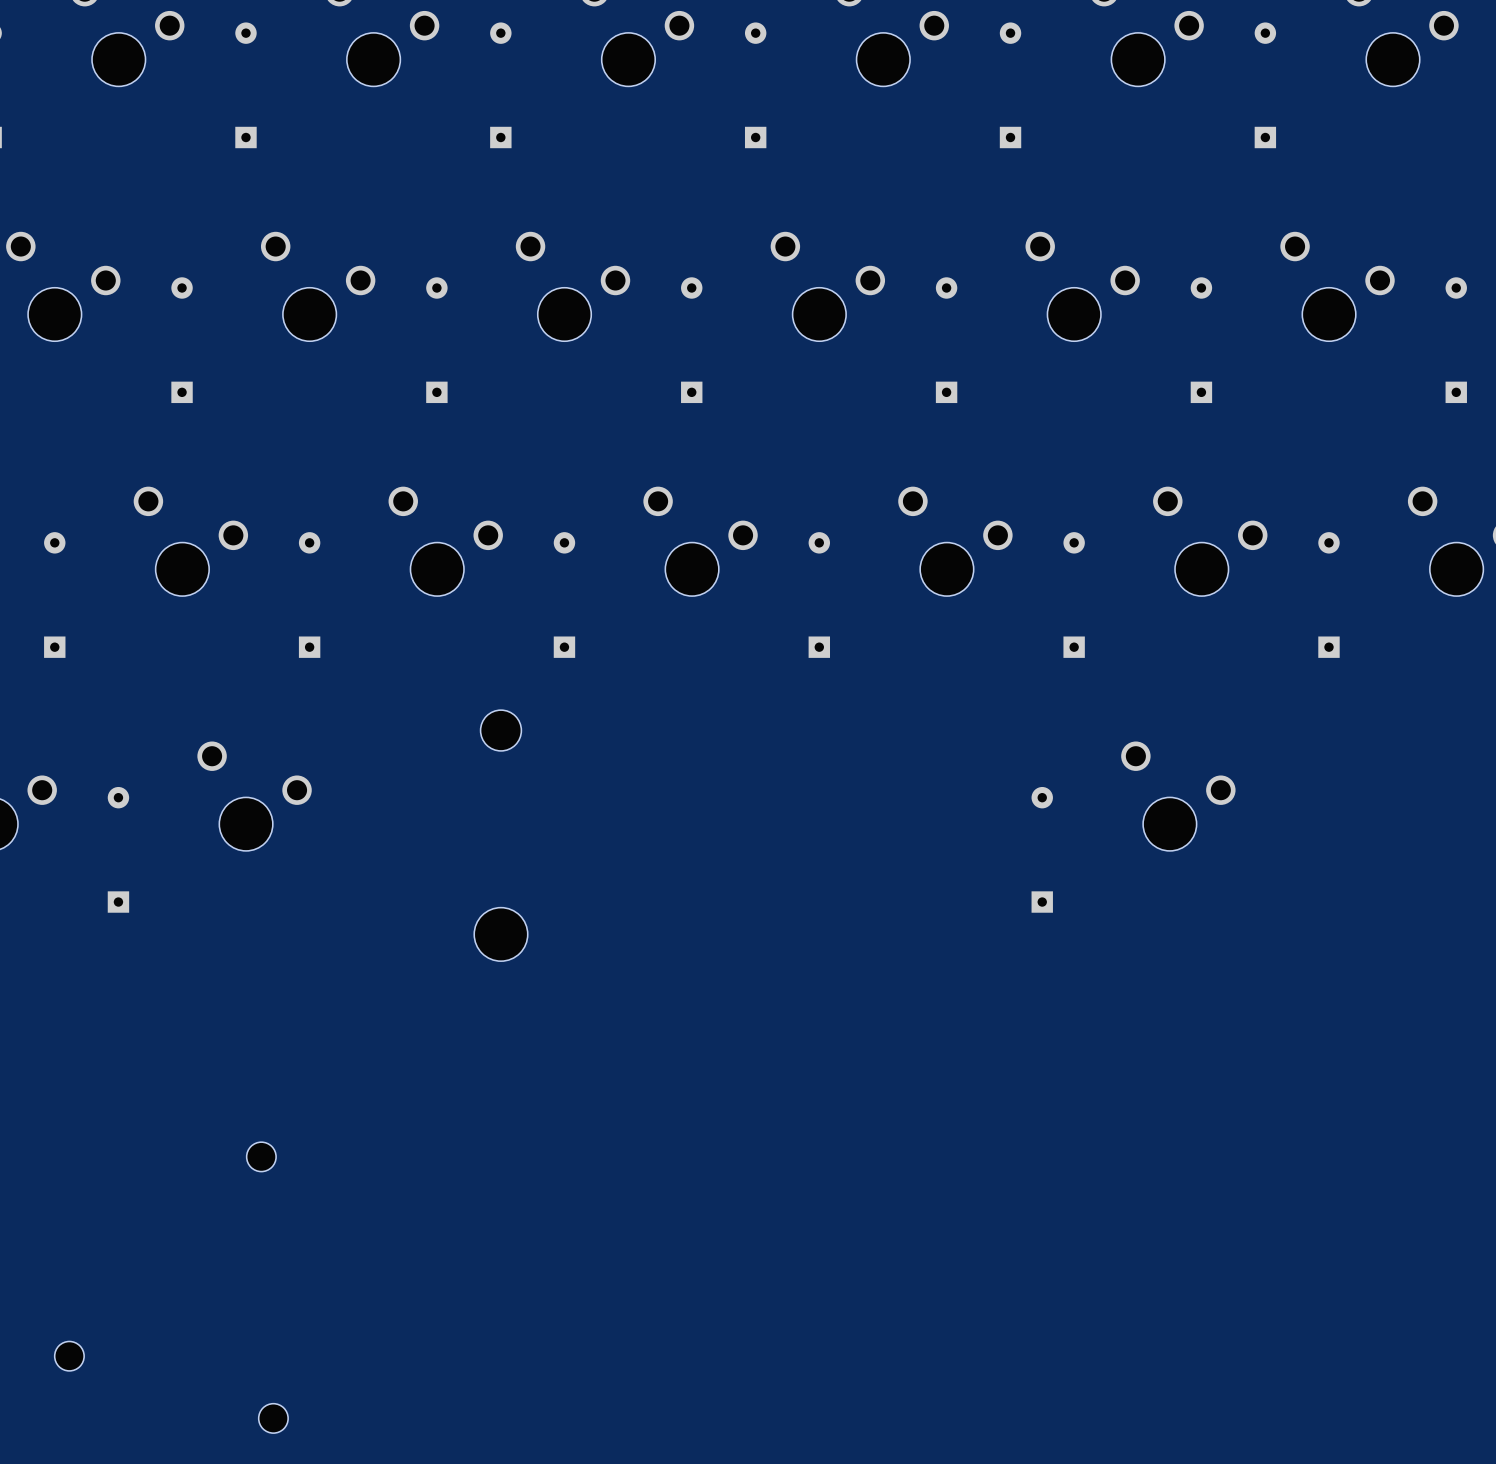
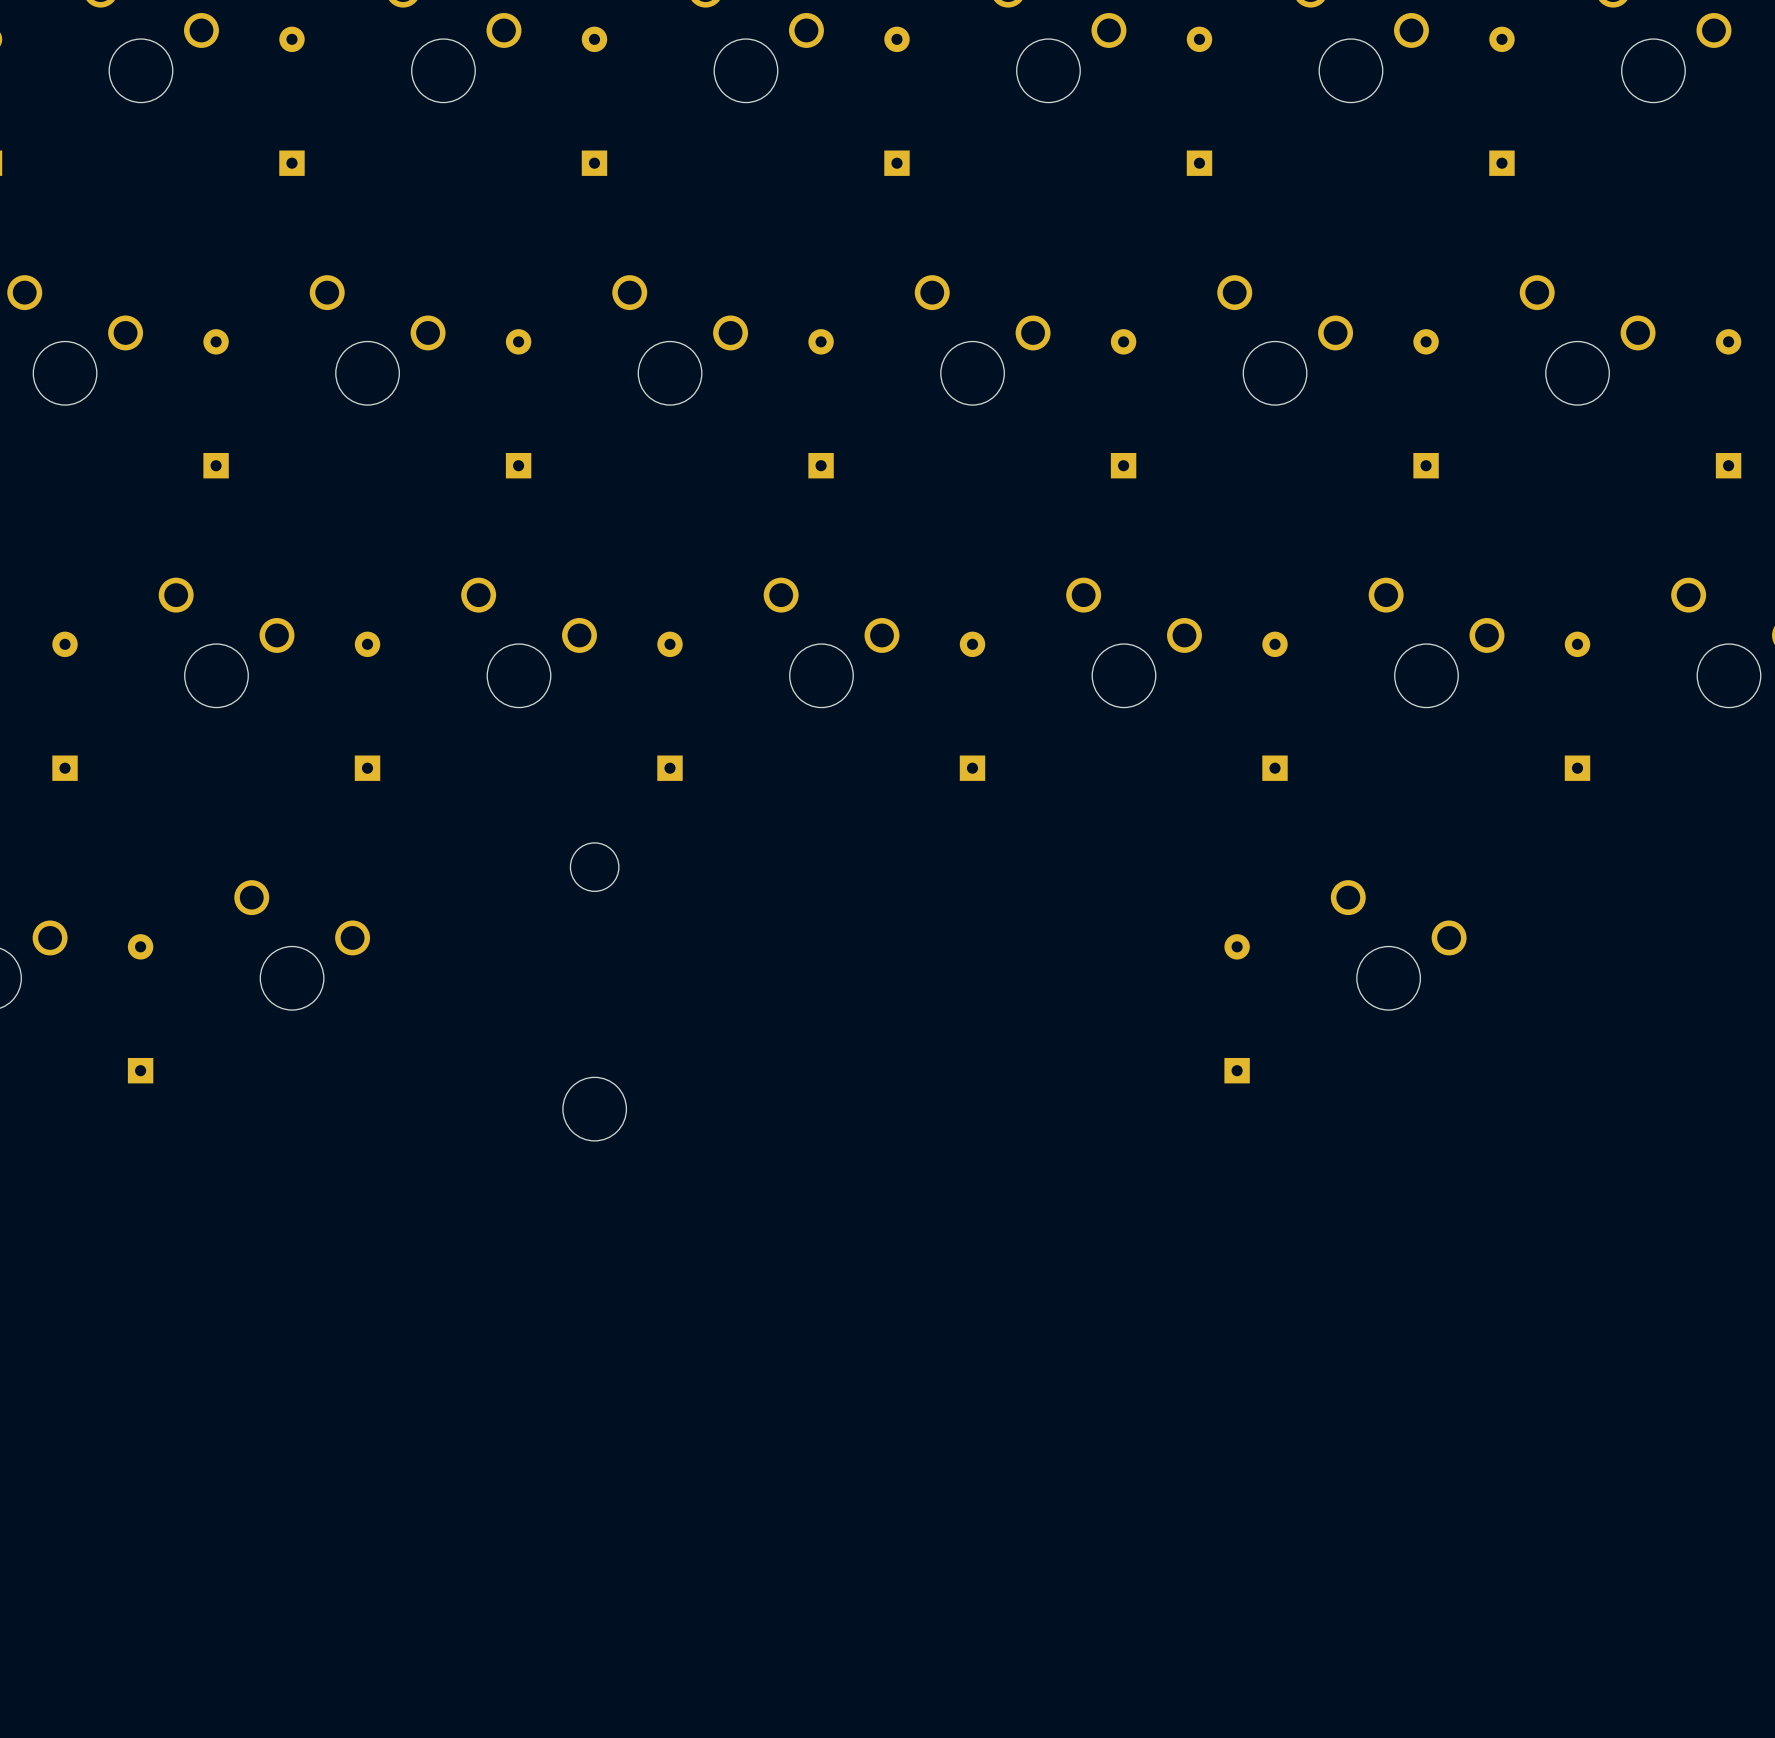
part: (261, 1156) -> none
part: (69, 1356) -> none
part: (273, 1418) -> none

